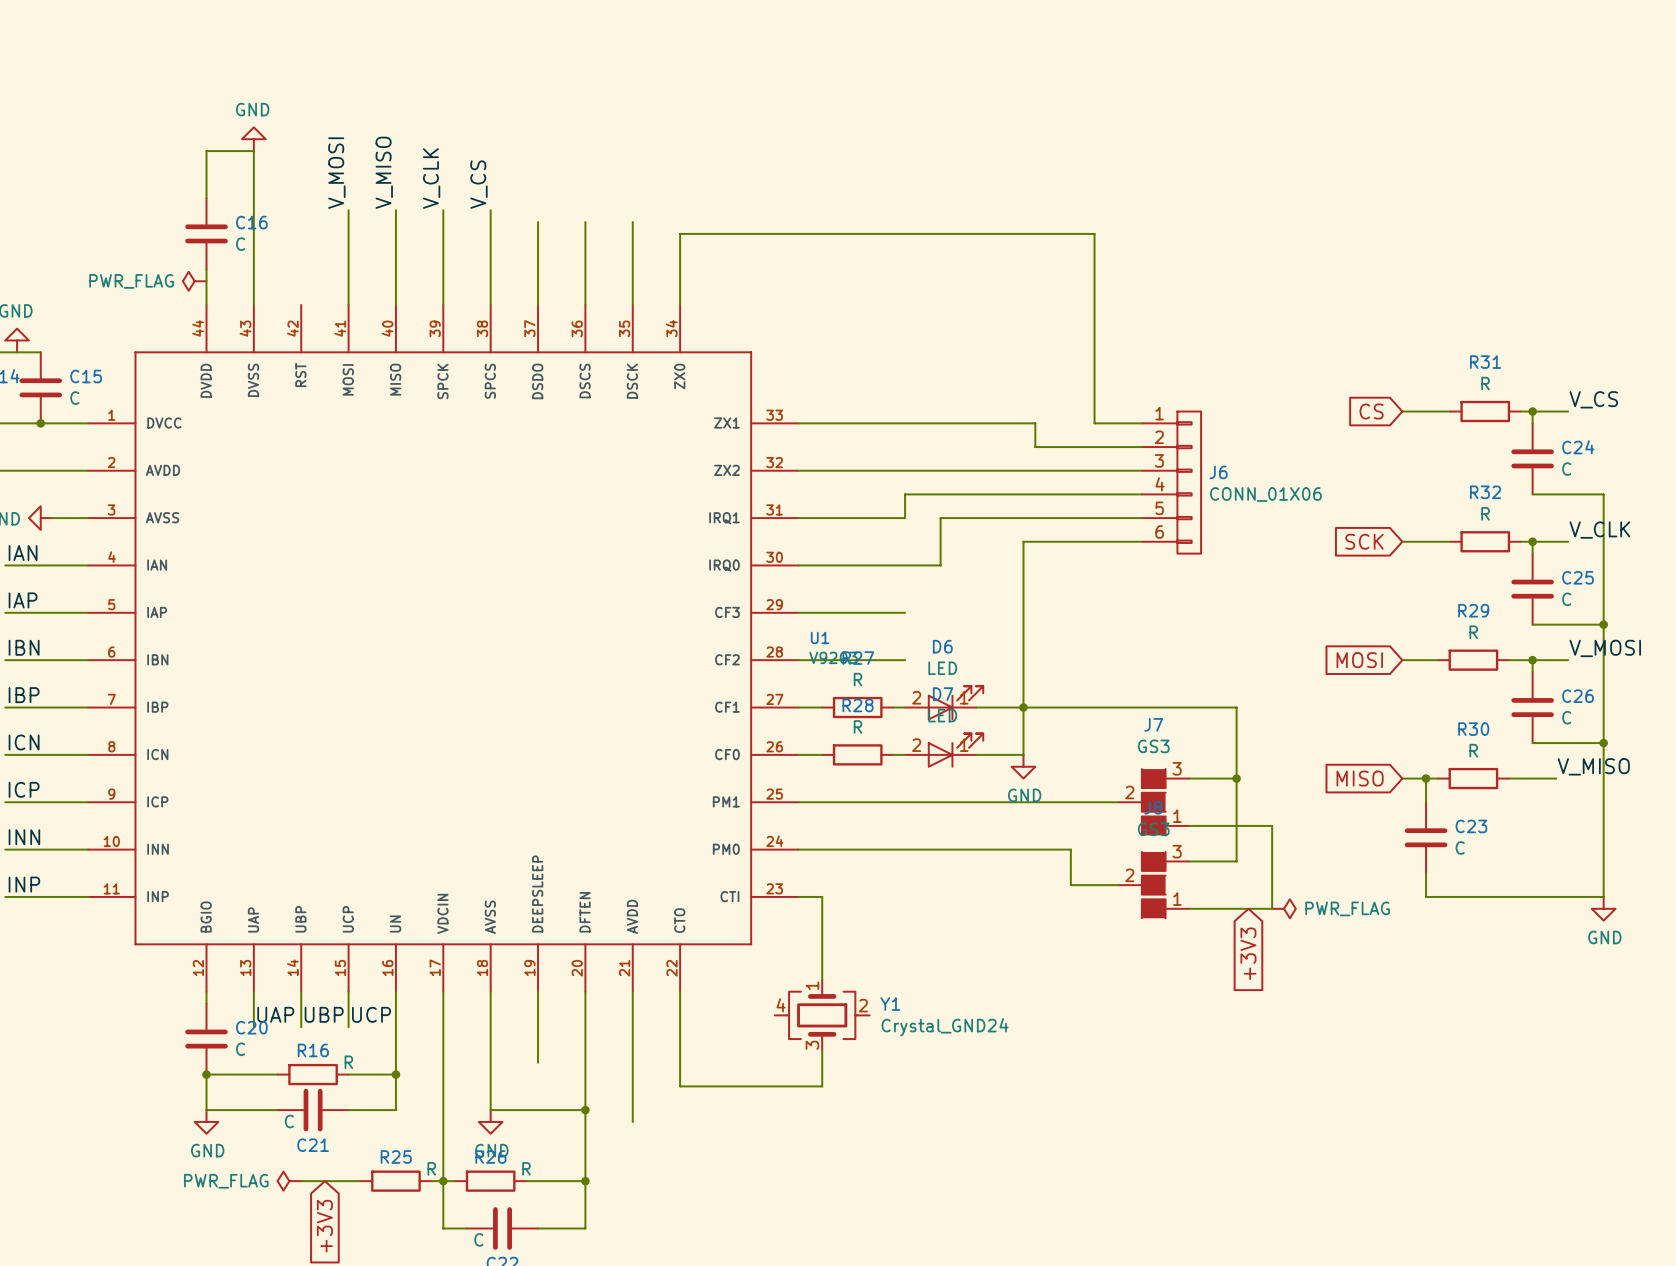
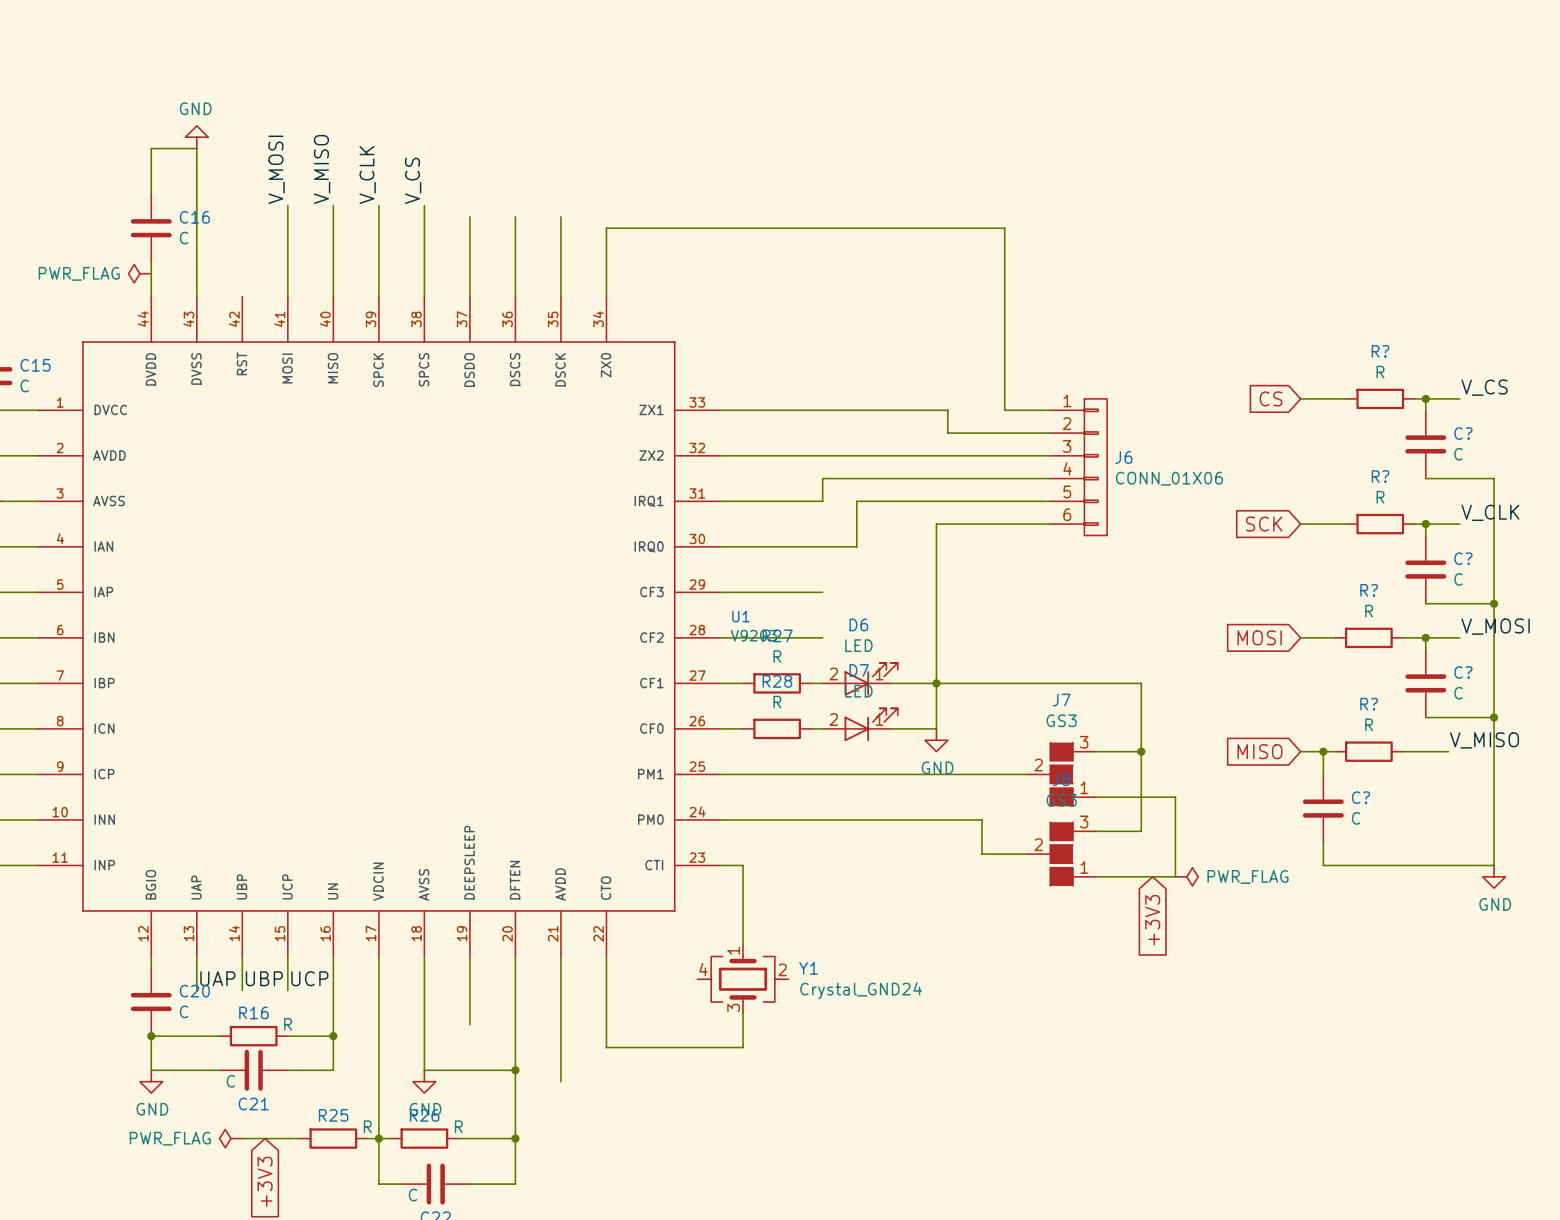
R31 name: R31 (1485, 362) -> R? (1380, 351)
C24 name: C24 (1578, 447) -> C? (1463, 433)
R32 name: R32 (1485, 492) -> R? (1380, 476)
C25 name: C25 (1577, 577) -> C? (1463, 558)
R29 name: R29 (1473, 610) -> R? (1369, 590)
C26 name: C26 (1577, 696) -> C? (1463, 672)
R30 name: R30 (1473, 729) -> R? (1369, 704)
C23 name: C23 (1471, 826) -> C? (1361, 797)

